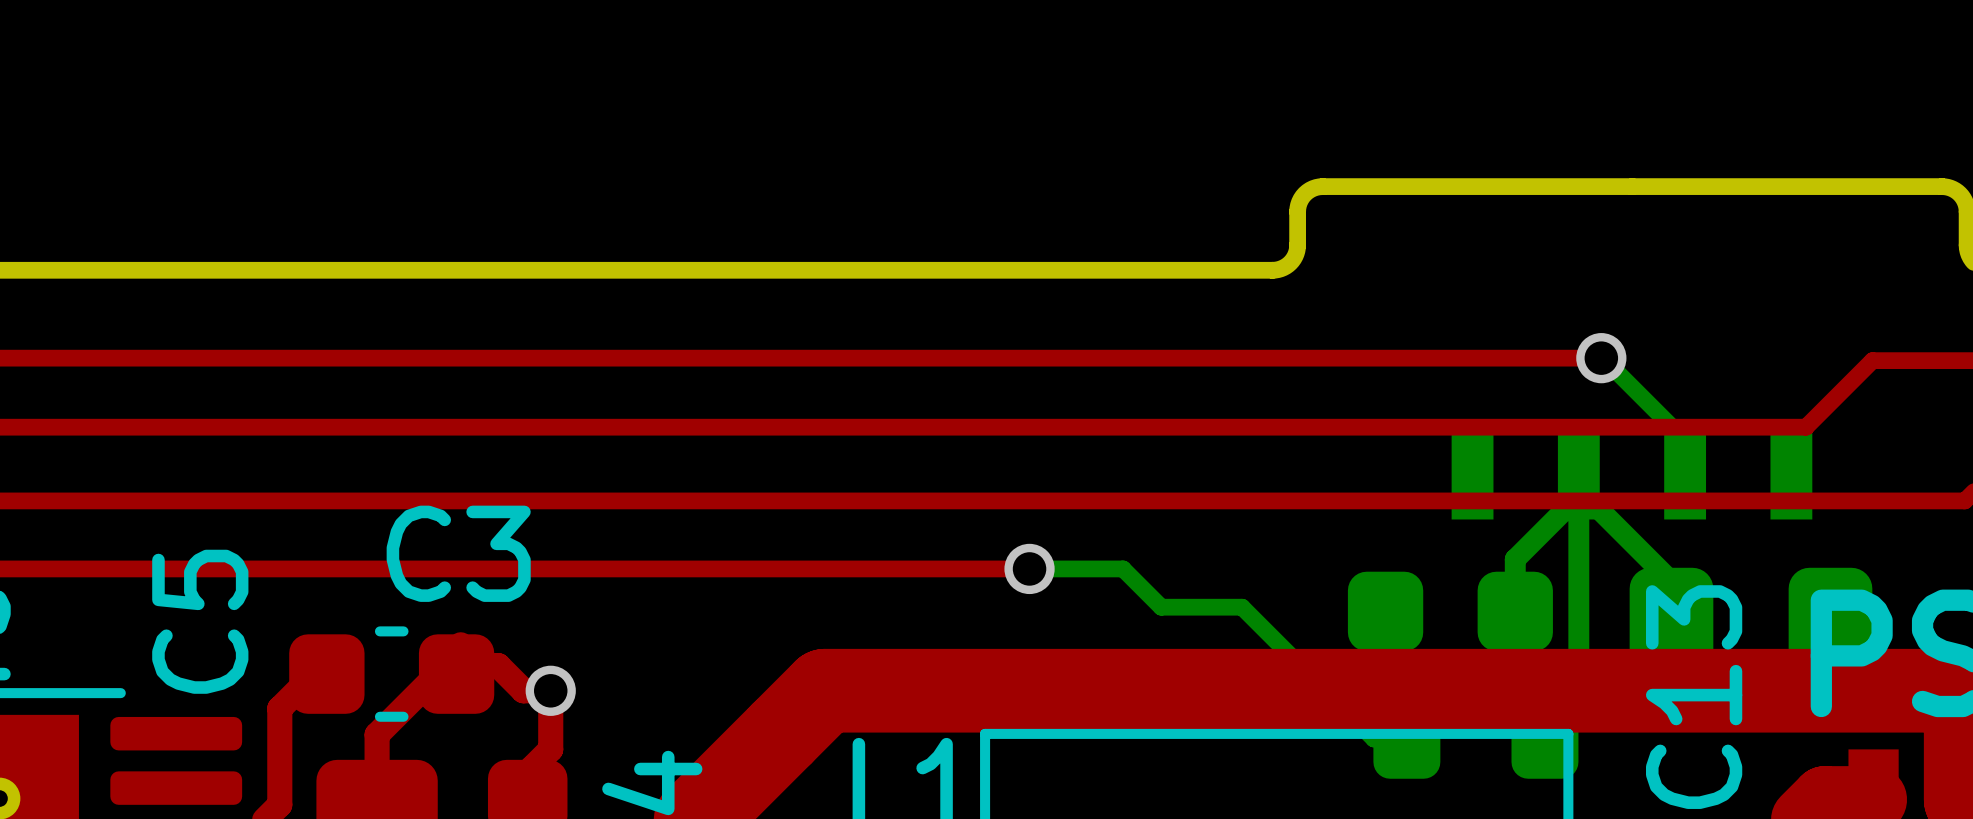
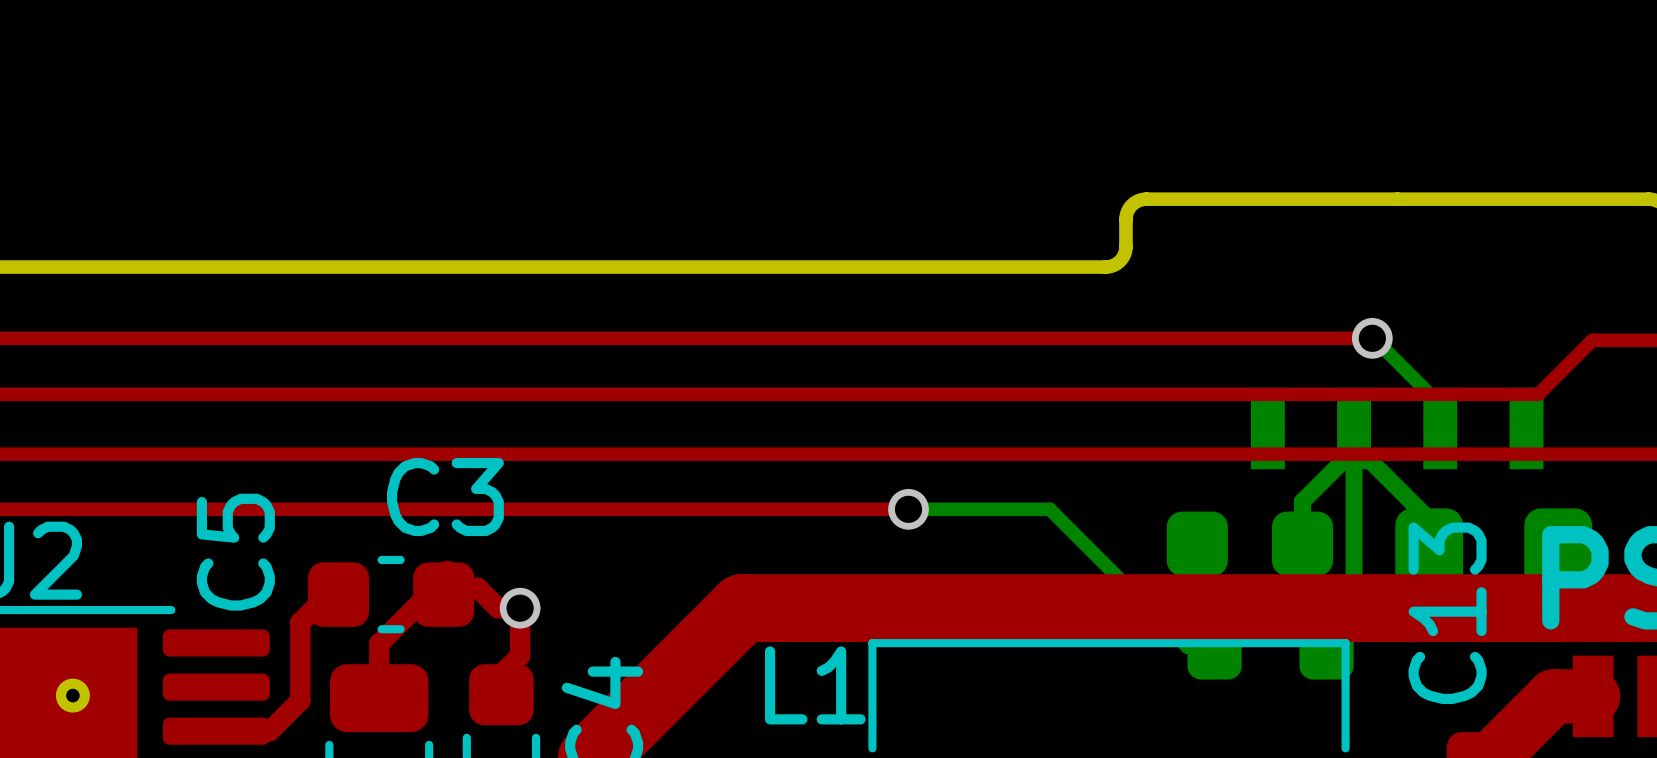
bottom track: (1123, 568) (1161, 607) (1242, 607) -> (984, 509) (1049, 509) (1080, 540)

